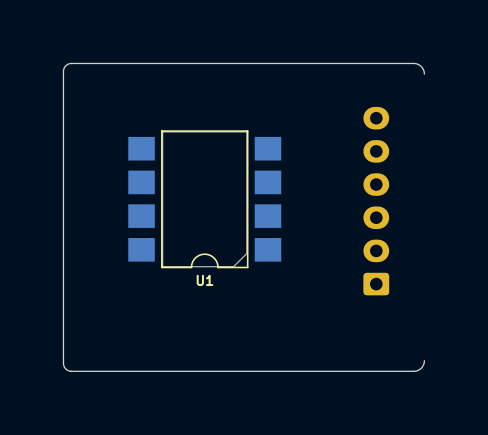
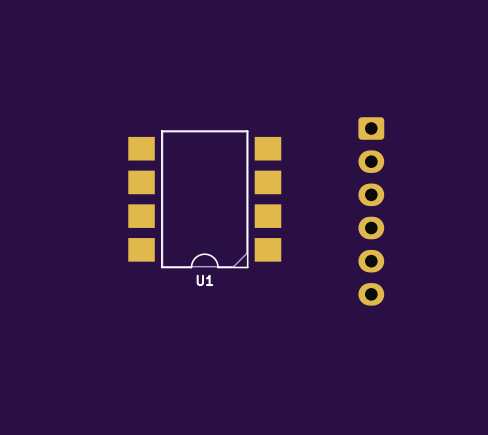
board edge: (424, 74) (421, 66) (413, 63) (71, 63) (65, 65) (63, 71) (63, 363) (66, 369) (71, 371) (413, 371) (421, 368) (424, 360) -> none
part rotation: 0° (376, 201) -> 180° (371, 211)

